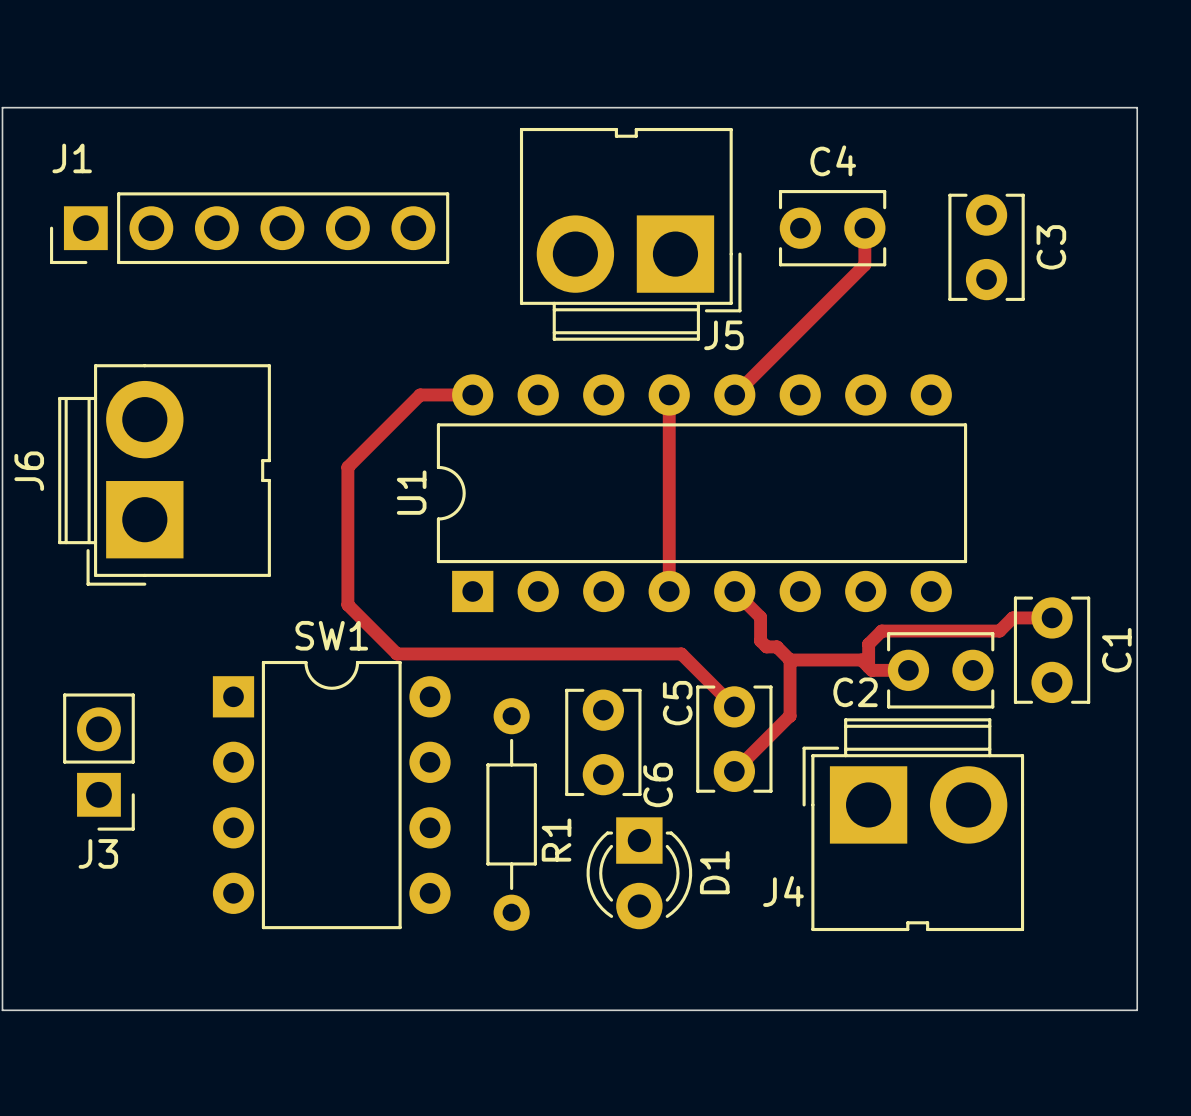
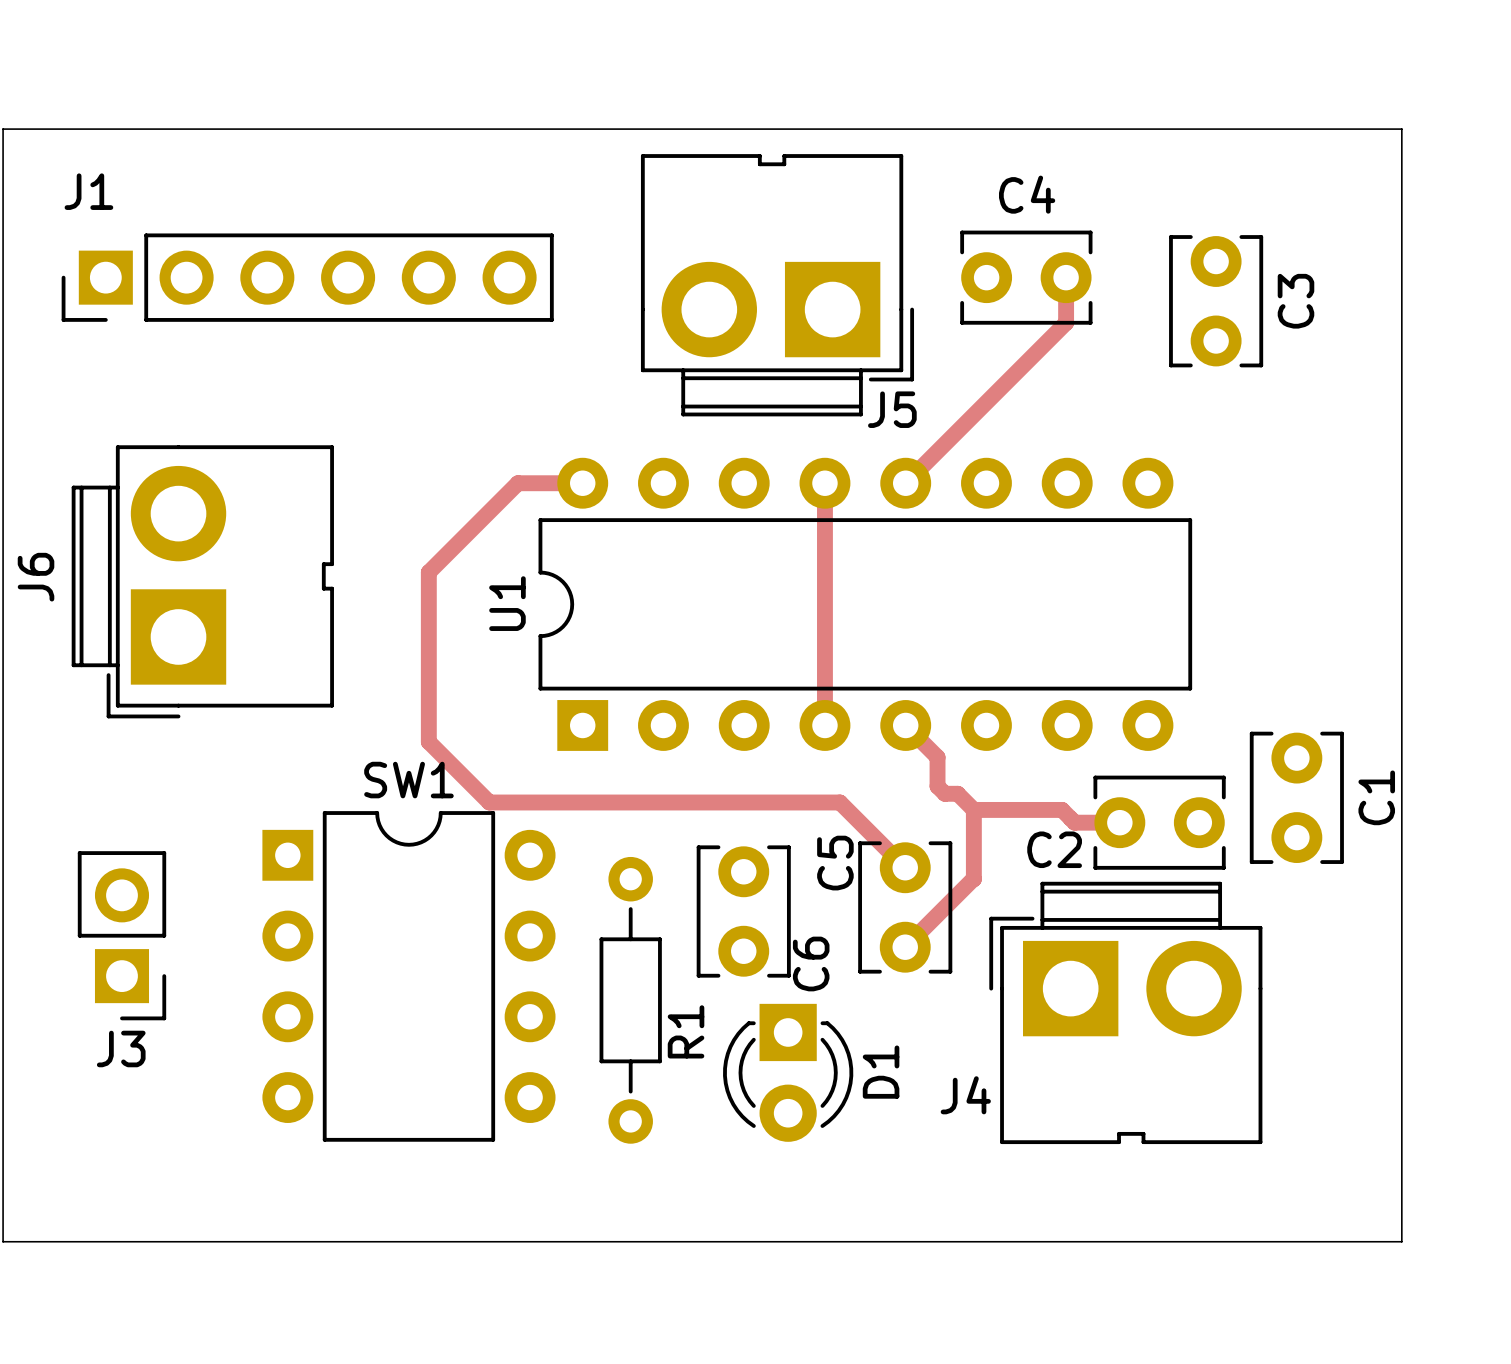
track: (1052, 617) (1012, 617) (999, 631) (881, 631) (868, 644) (868, 667) -> none

